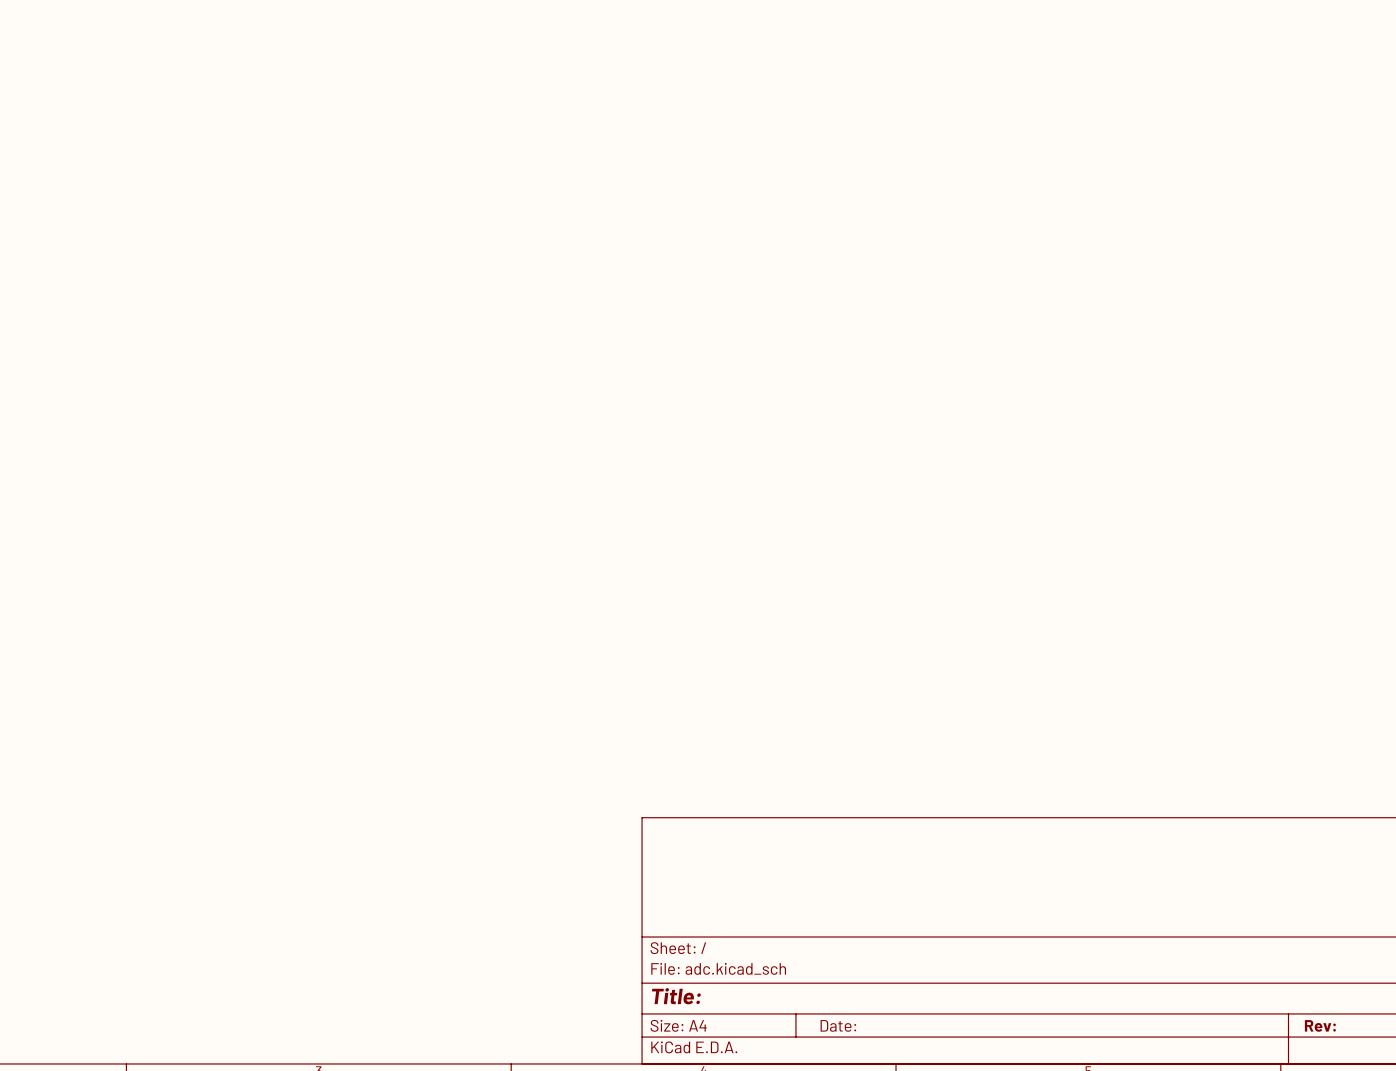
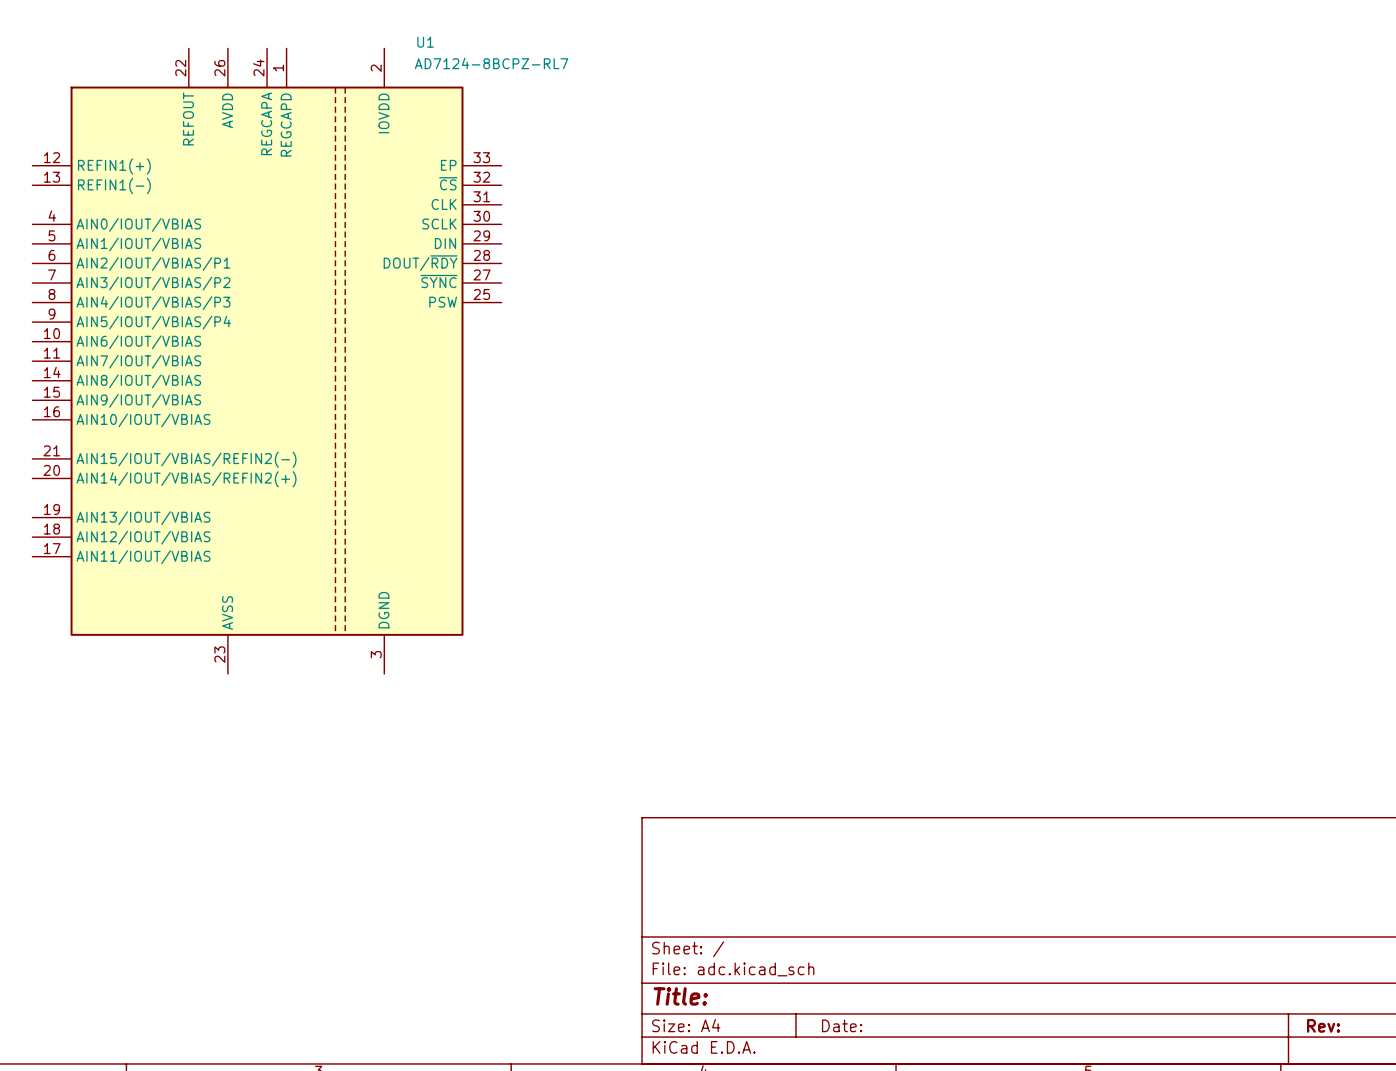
U1: none -> AD7124-8BCPZ-RL7 (267, 361)

